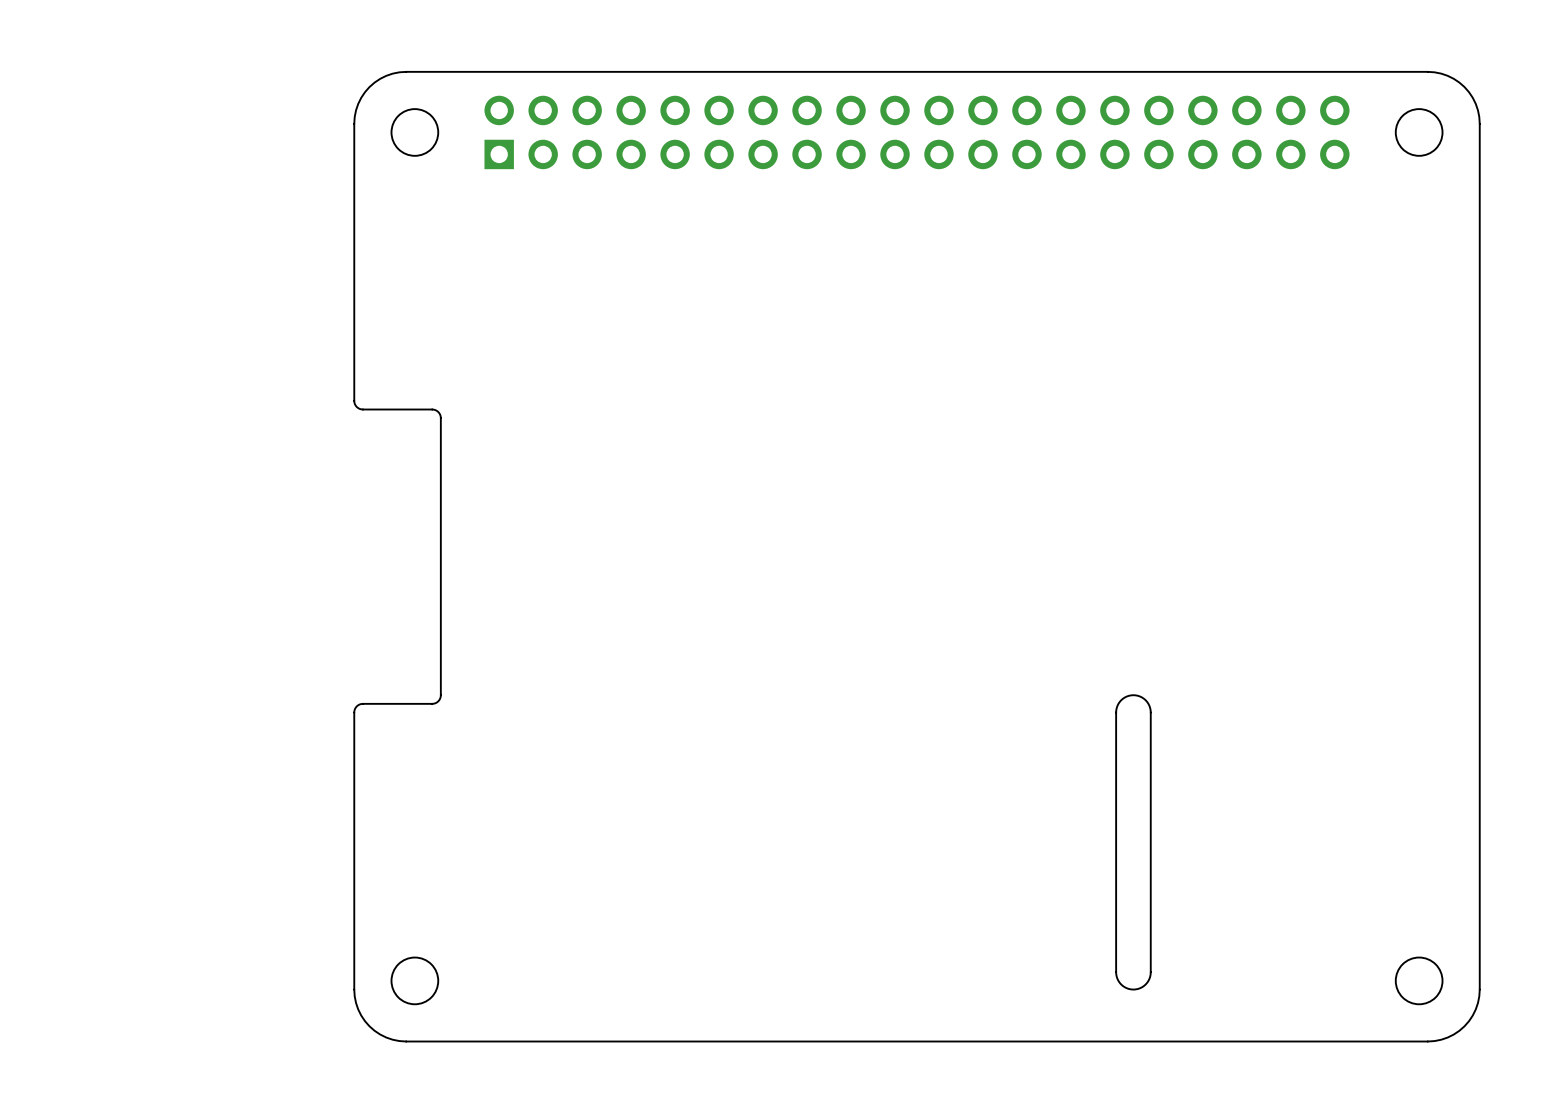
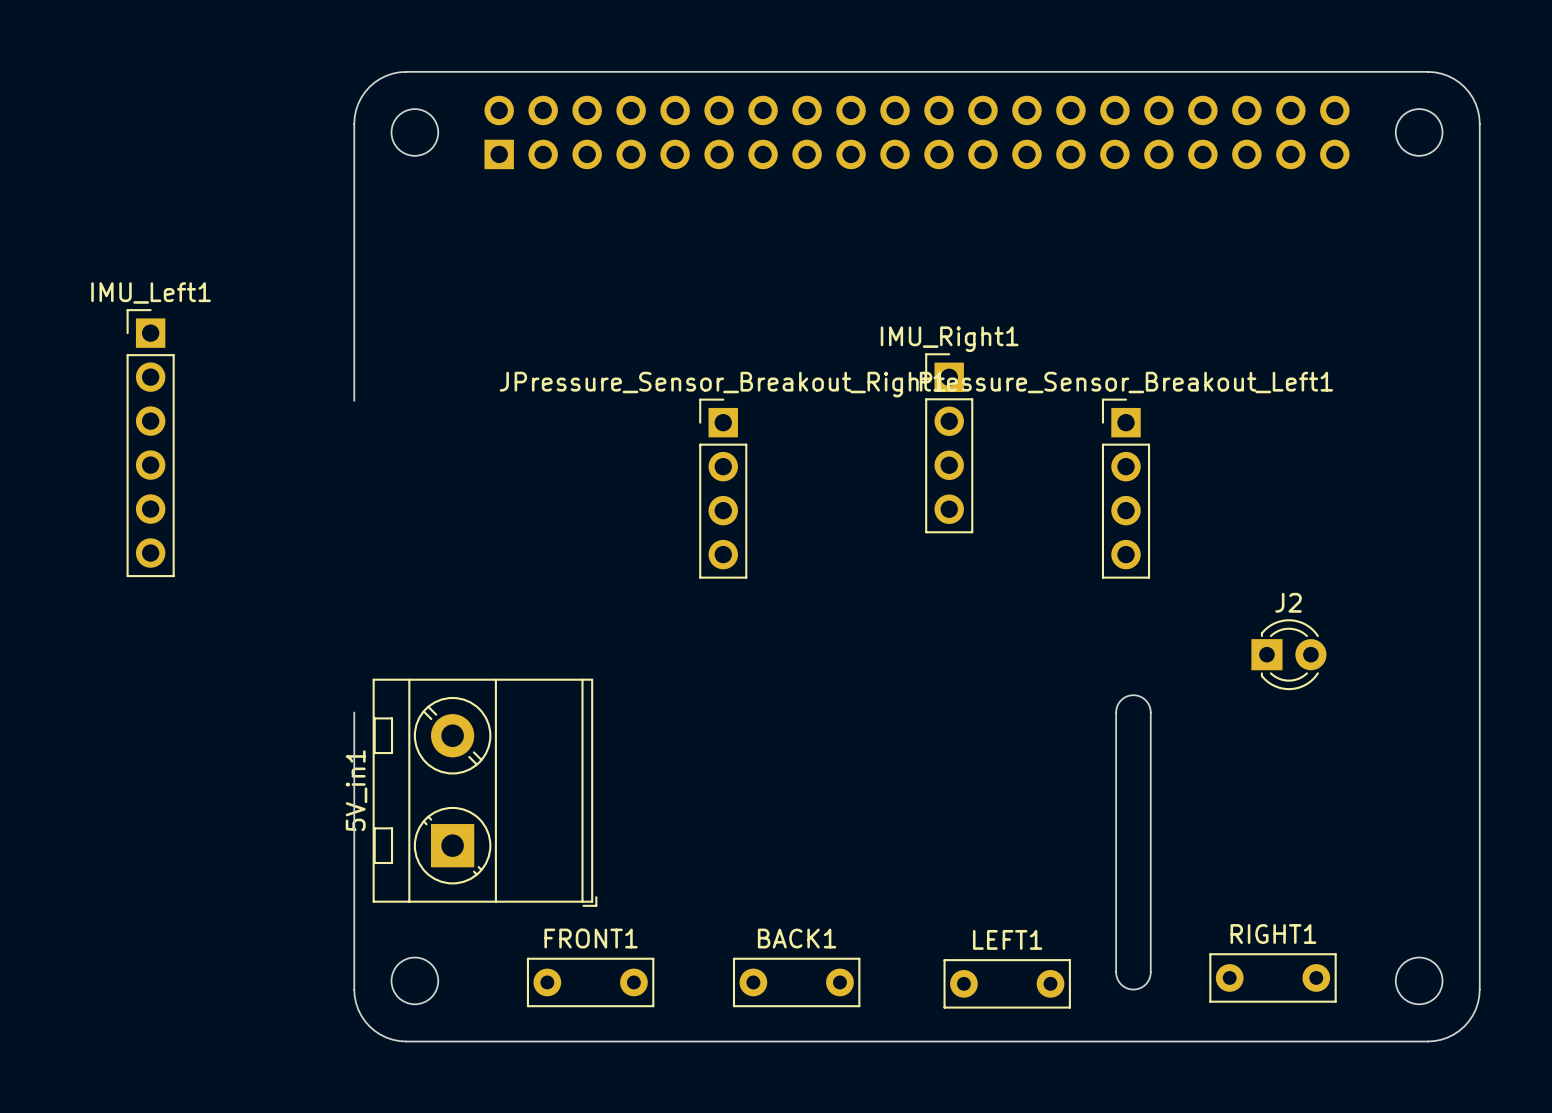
board edge: (354, 400) (356, 406) (361, 409) (434, 409) (439, 412) (440, 418) (440, 697) (433, 703) (361, 703) (356, 706) (354, 712) -> none
IMU_Left1: none -> (150, 443)
IMU_Right1: none -> (949, 443)
JPressure_Sensor_Breakout_Right1: none -> (723, 488)
Pressure_Sensor_Breakout_Left1: none -> (1126, 488)
J2: none -> (1288, 654)
5V_in1: none -> (485, 792)
RIGHT1: none -> (1273, 977)
FRONT1: none -> (590, 982)
BACK1: none -> (796, 982)
LEFT1: none -> (1007, 983)

